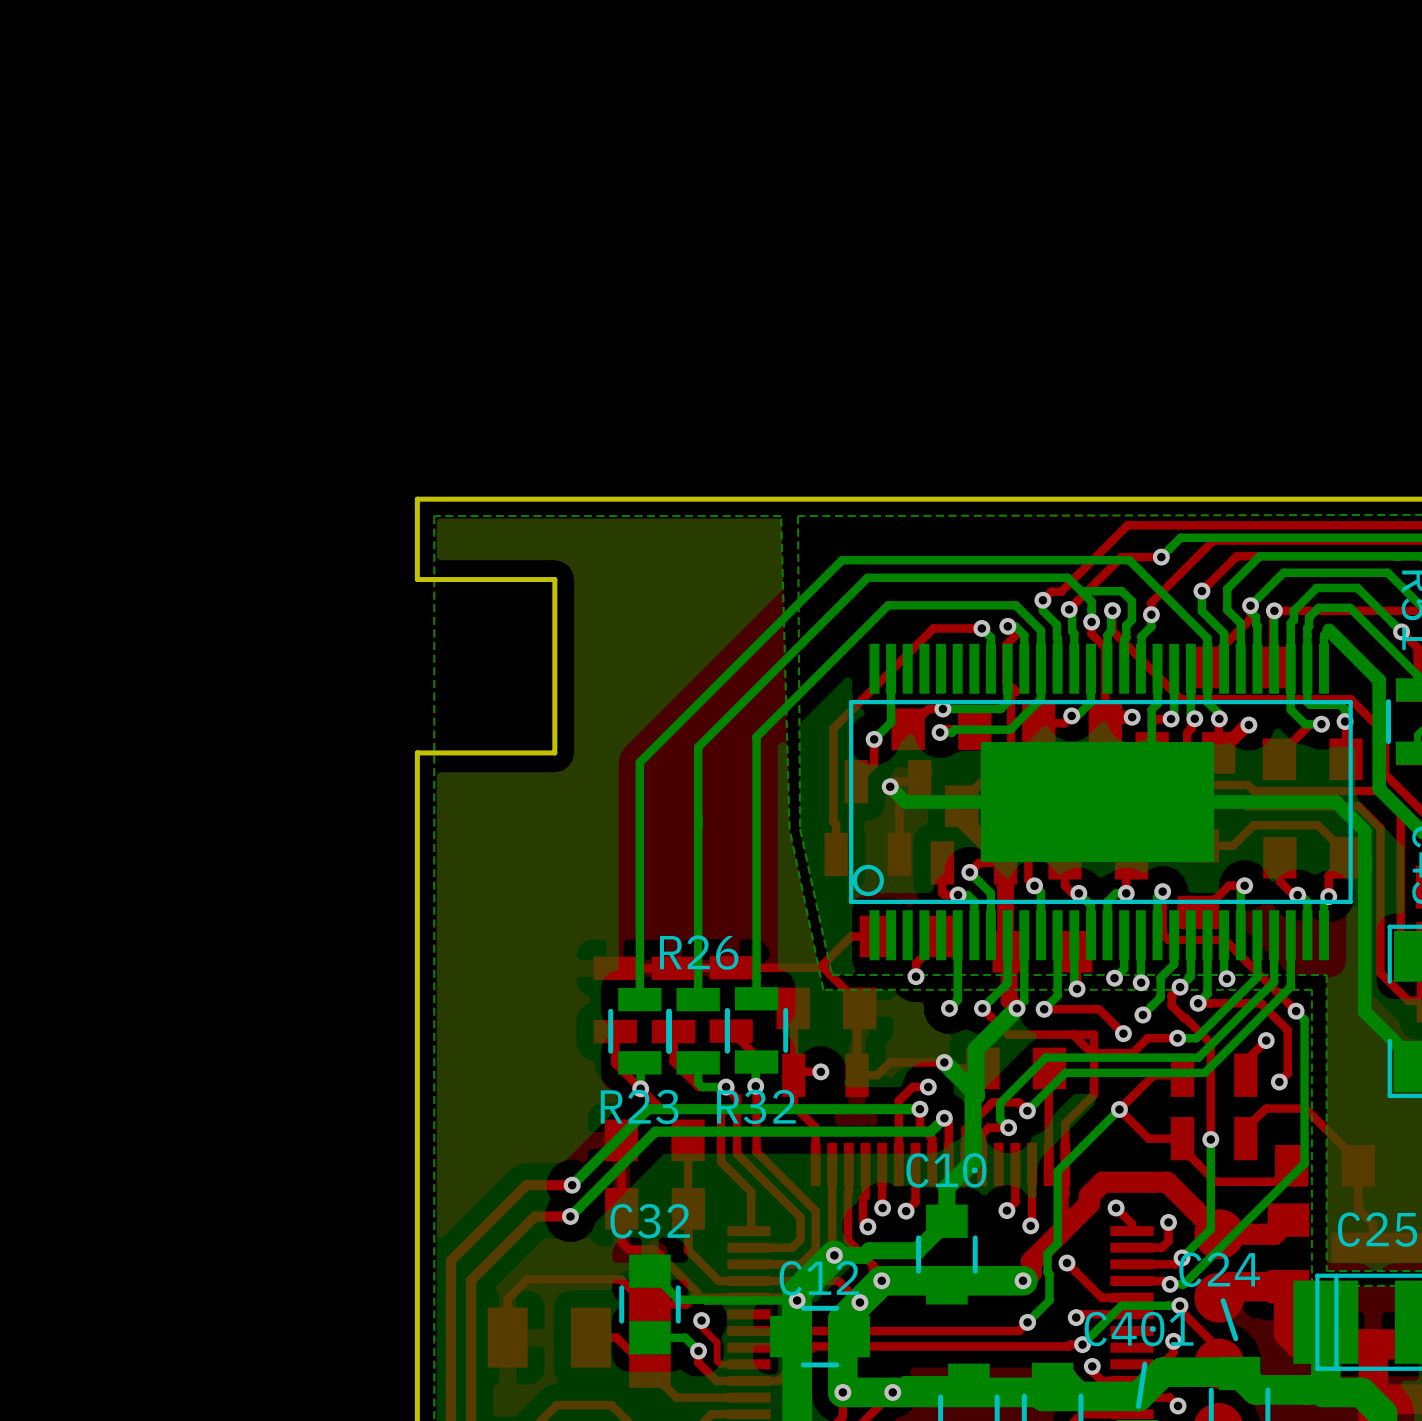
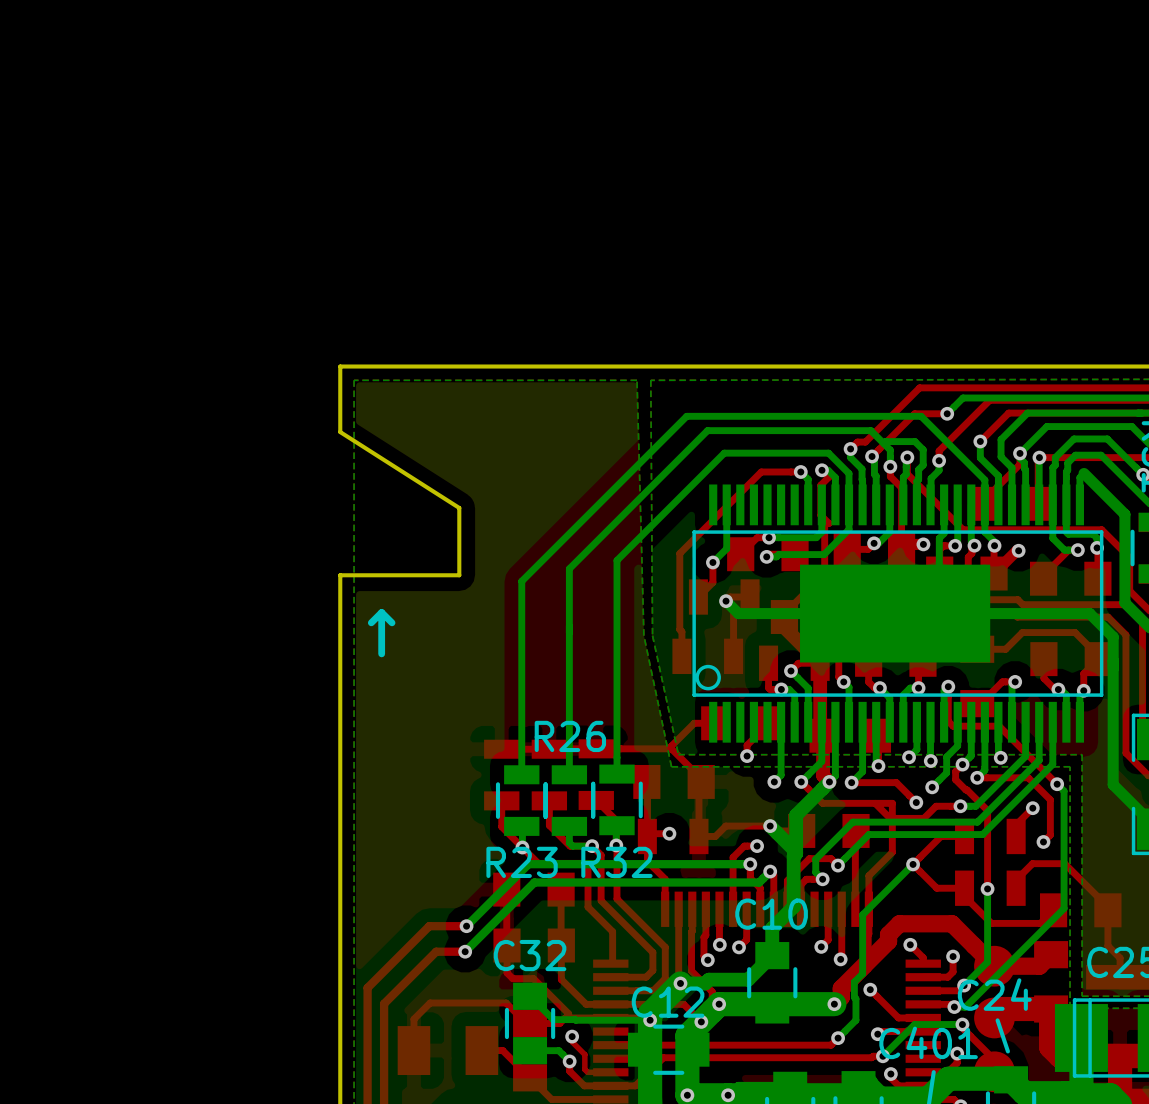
board edge: (417, 579) (554, 579) (554, 752) (417, 752) (417, 755) -> (340, 432) (459, 507) (459, 575) (340, 575)
text: none -> ↑ (381, 633)

